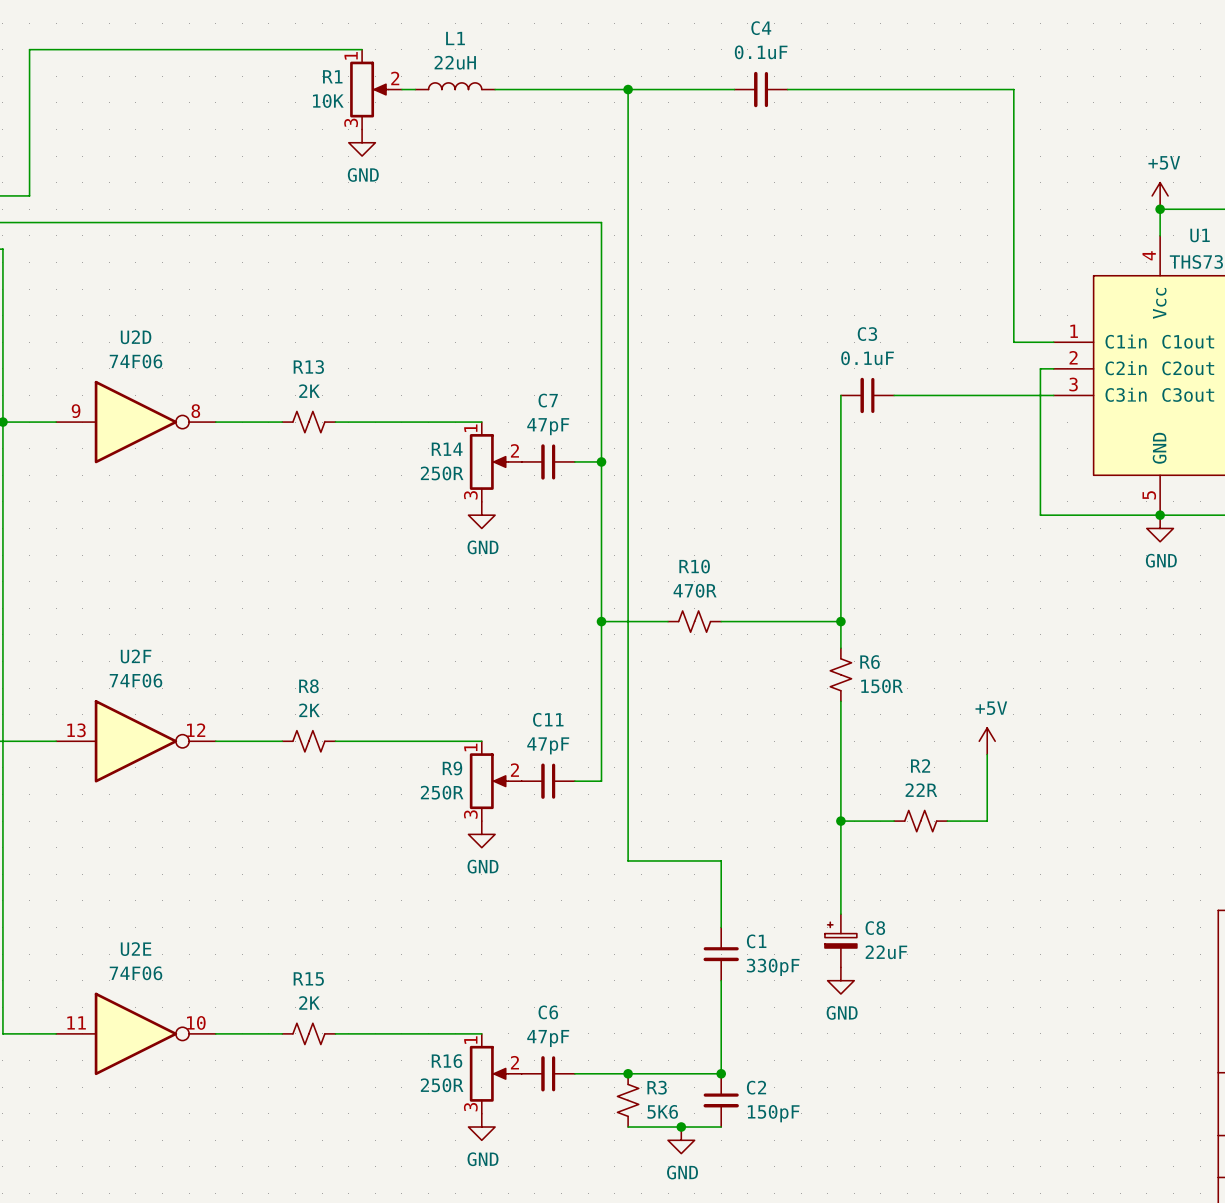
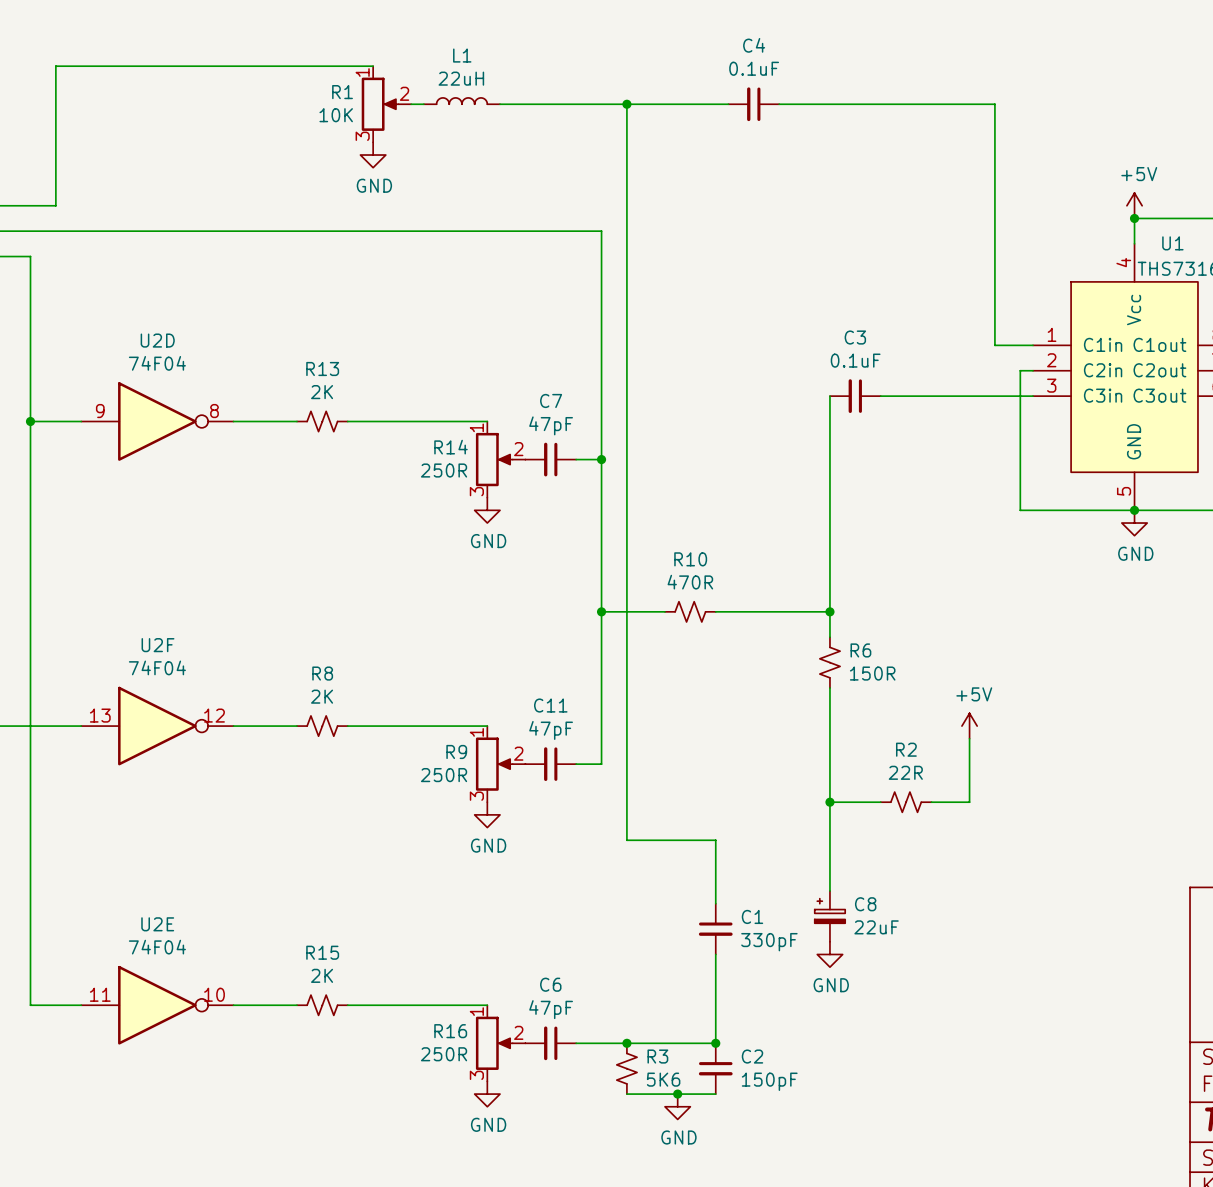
U2D value: 74F06 (135, 361) -> 74F04 (157, 363)
U2F value: 74F06 (135, 680) -> 74F04 (157, 667)
U2E value: 74F06 (135, 973) -> 74F04 (157, 947)

